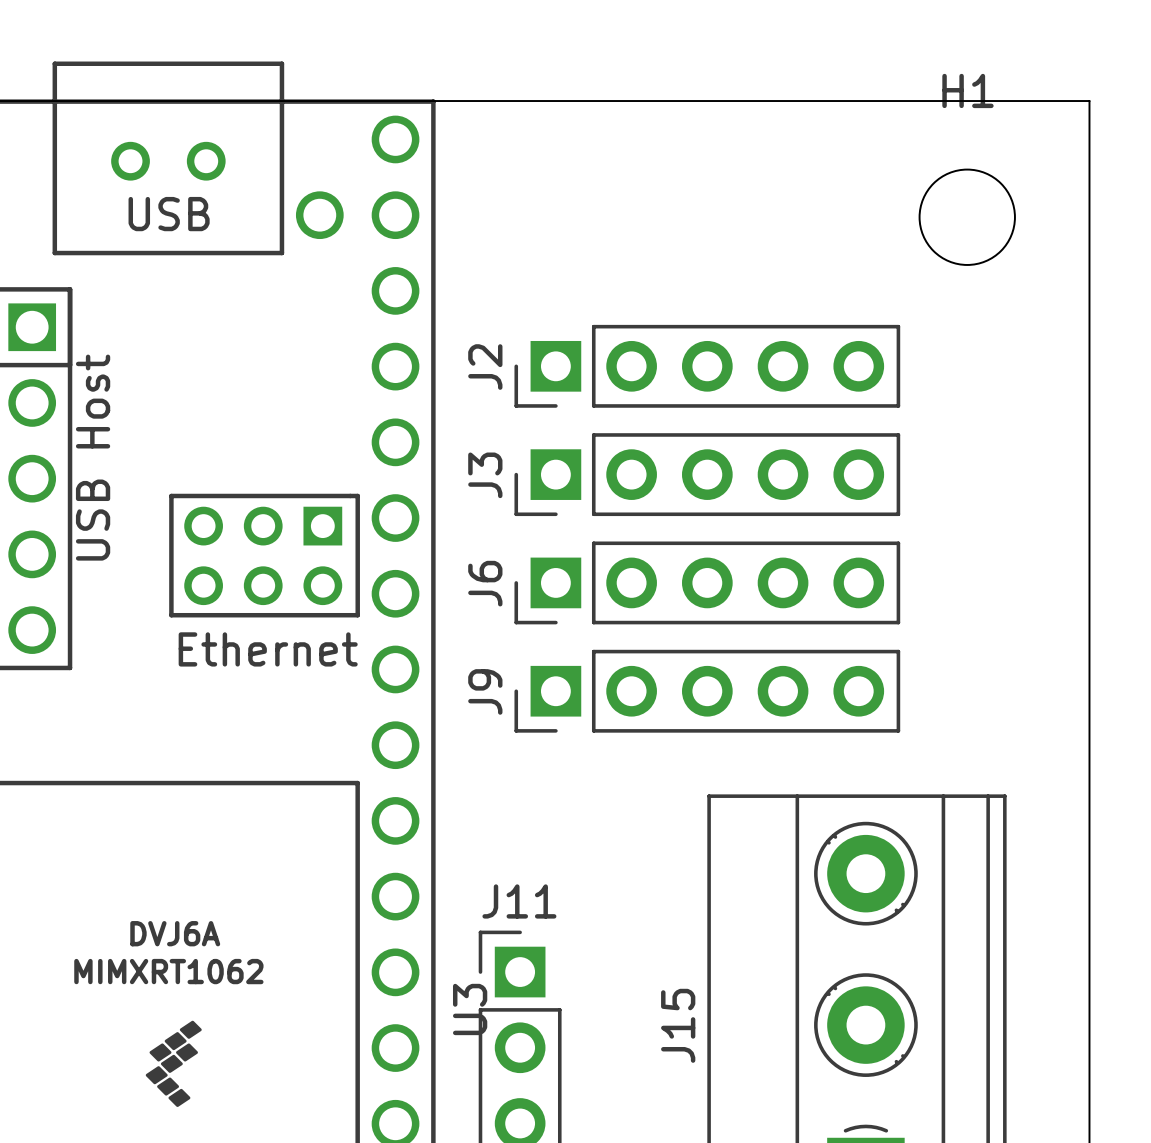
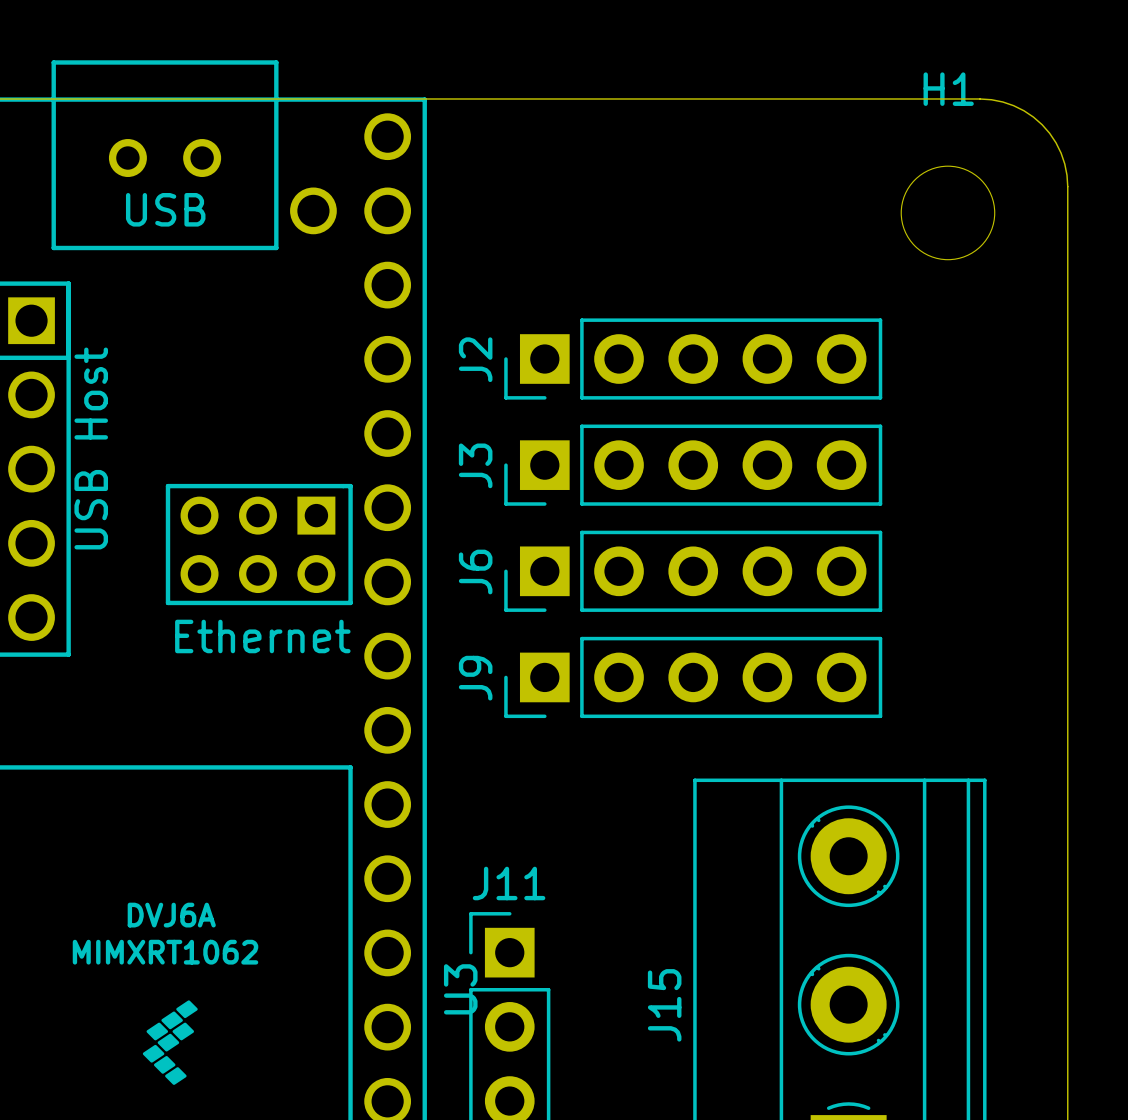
board edge: (1000, 101) (1089, 101) (1089, 190) -> (980, 99) (1013, 105) (1042, 124) (1061, 153) (1067, 186)

